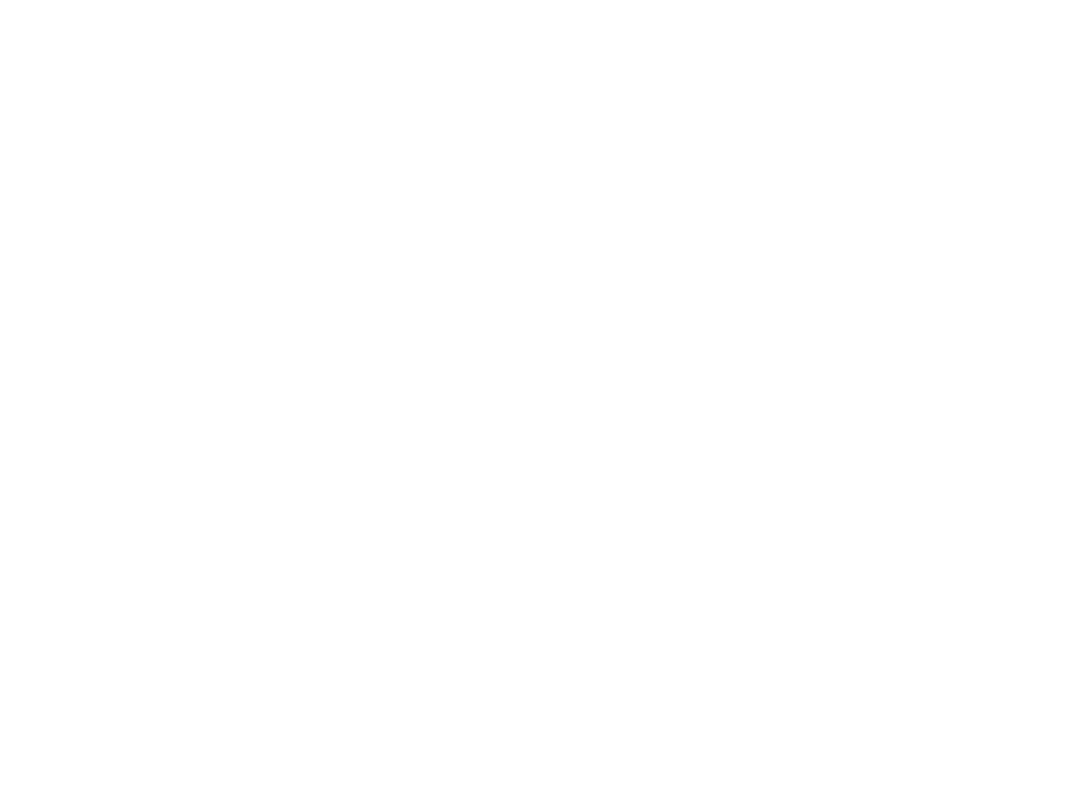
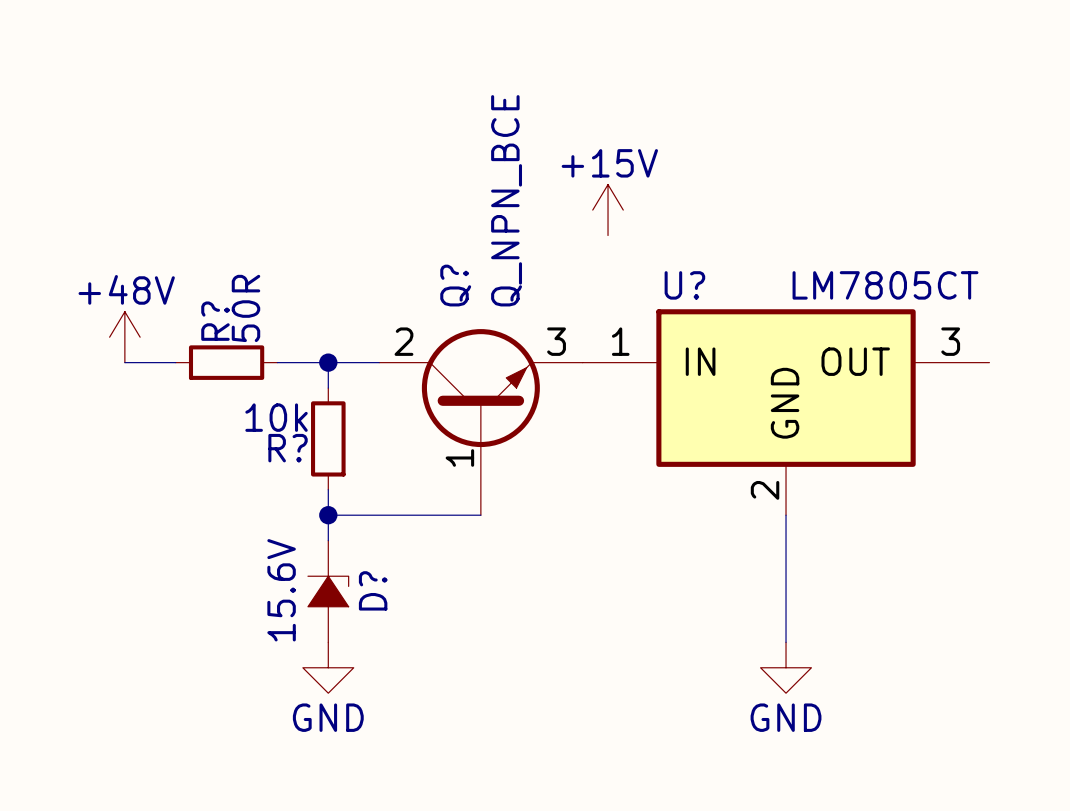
power symbol: none -> +15V (608, 210)
power symbol: none -> +48V (124, 337)
wire: none -> (124, 362) (175, 362)
R?: none -> 50R (226, 362)
wire: none -> (277, 362) (379, 362)
wire: none -> (328, 362) (328, 388)
junction: none -> (328, 362)
U?: none -> LM7805CT (786, 412)
Q?: none -> Q_NPN_BCE (480, 422)
R?: none -> 10k (328, 438)
wire: none -> (328, 489) (328, 540)
wire: none -> (328, 515) (480, 515)
junction: none -> (328, 515)
wire: none -> (786, 515) (786, 642)
D?: none -> 15.6V (328, 591)
power symbol: none -> GND (328, 667)
power symbol: none -> GND (786, 667)

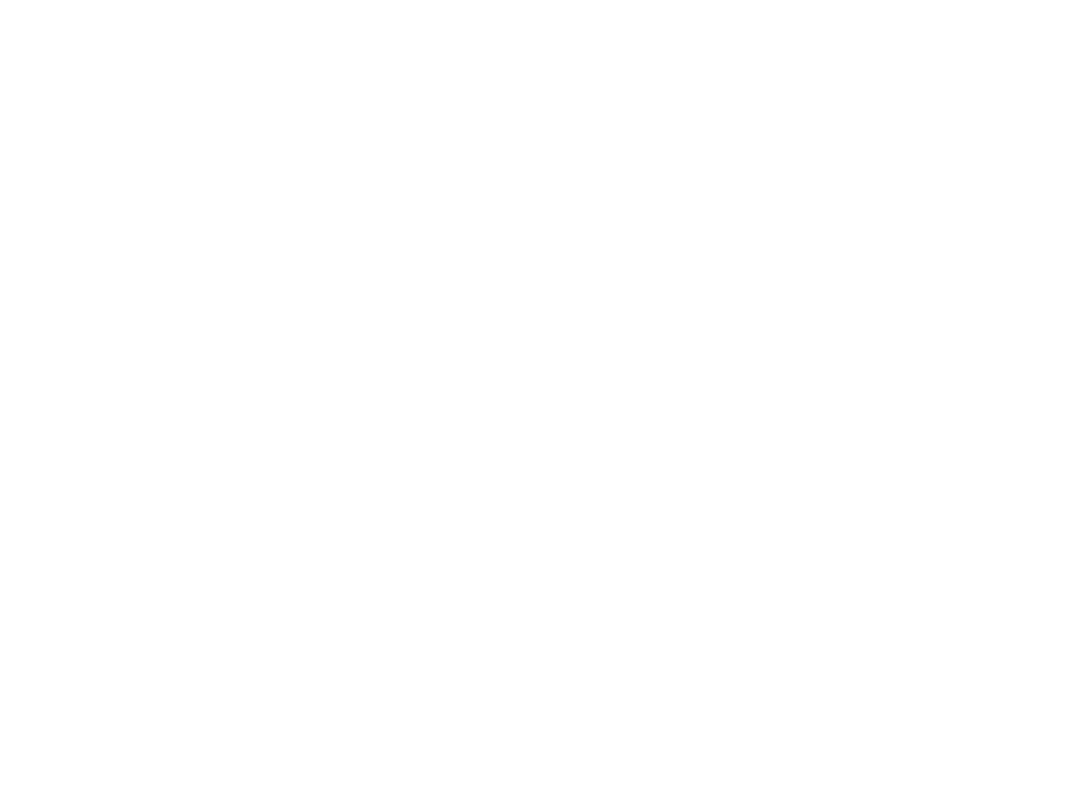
power symbol: +15V (608, 210) -> none
power symbol: +48V (124, 337) -> none
wire: (124, 362) (175, 362) -> none
R?: 50R (226, 362) -> none
wire: (277, 362) (379, 362) -> none
wire: (328, 362) (328, 388) -> none
junction: (328, 362) -> none
U?: LM7805CT (786, 412) -> none
Q?: Q_NPN_BCE (480, 422) -> none
R?: 10k (328, 438) -> none
wire: (328, 489) (328, 540) -> none
wire: (328, 515) (480, 515) -> none
junction: (328, 515) -> none
wire: (786, 515) (786, 642) -> none
D?: 15.6V (328, 591) -> none
power symbol: GND (328, 667) -> none
power symbol: GND (786, 667) -> none

